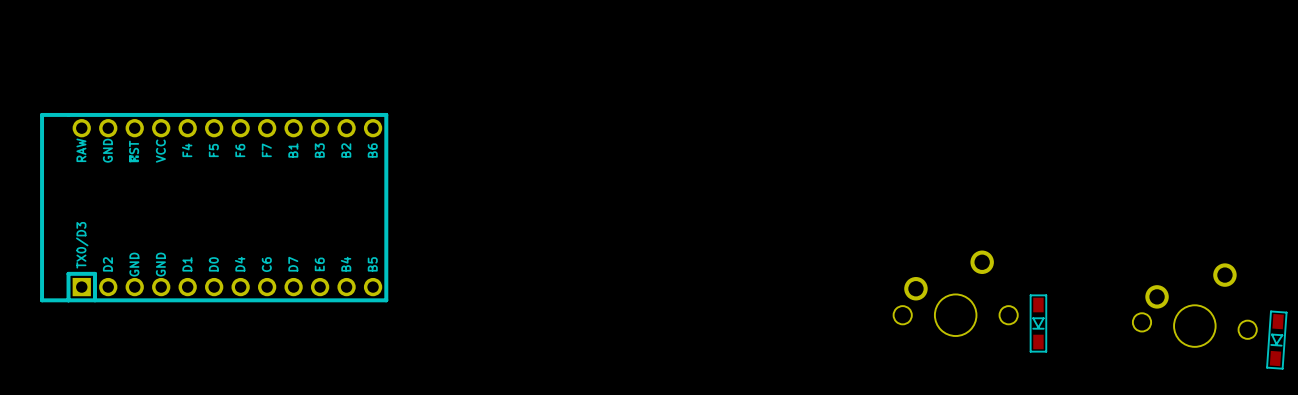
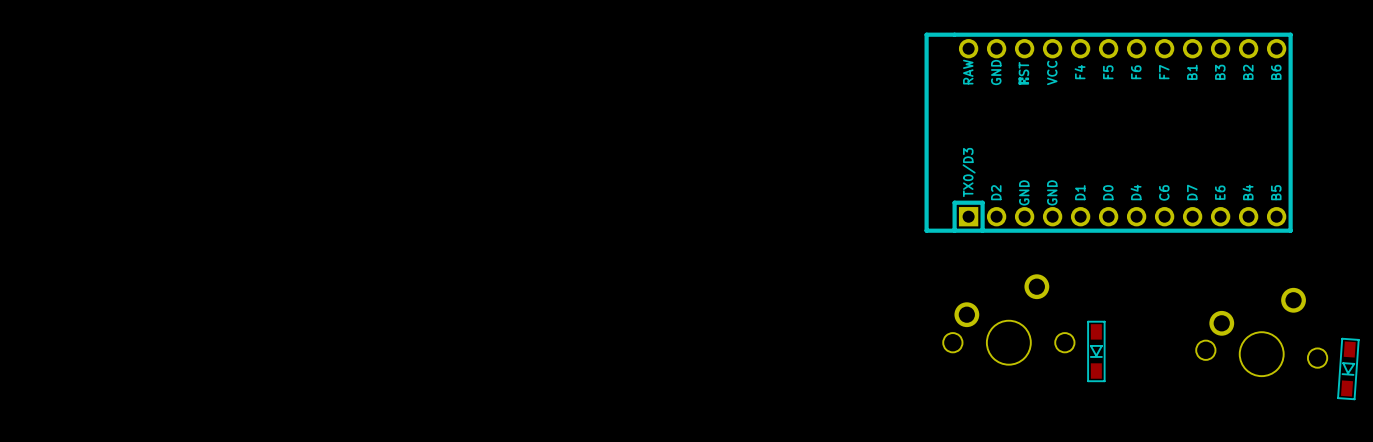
part: none -> (1108, 132)
part: (214, 207) -> none

